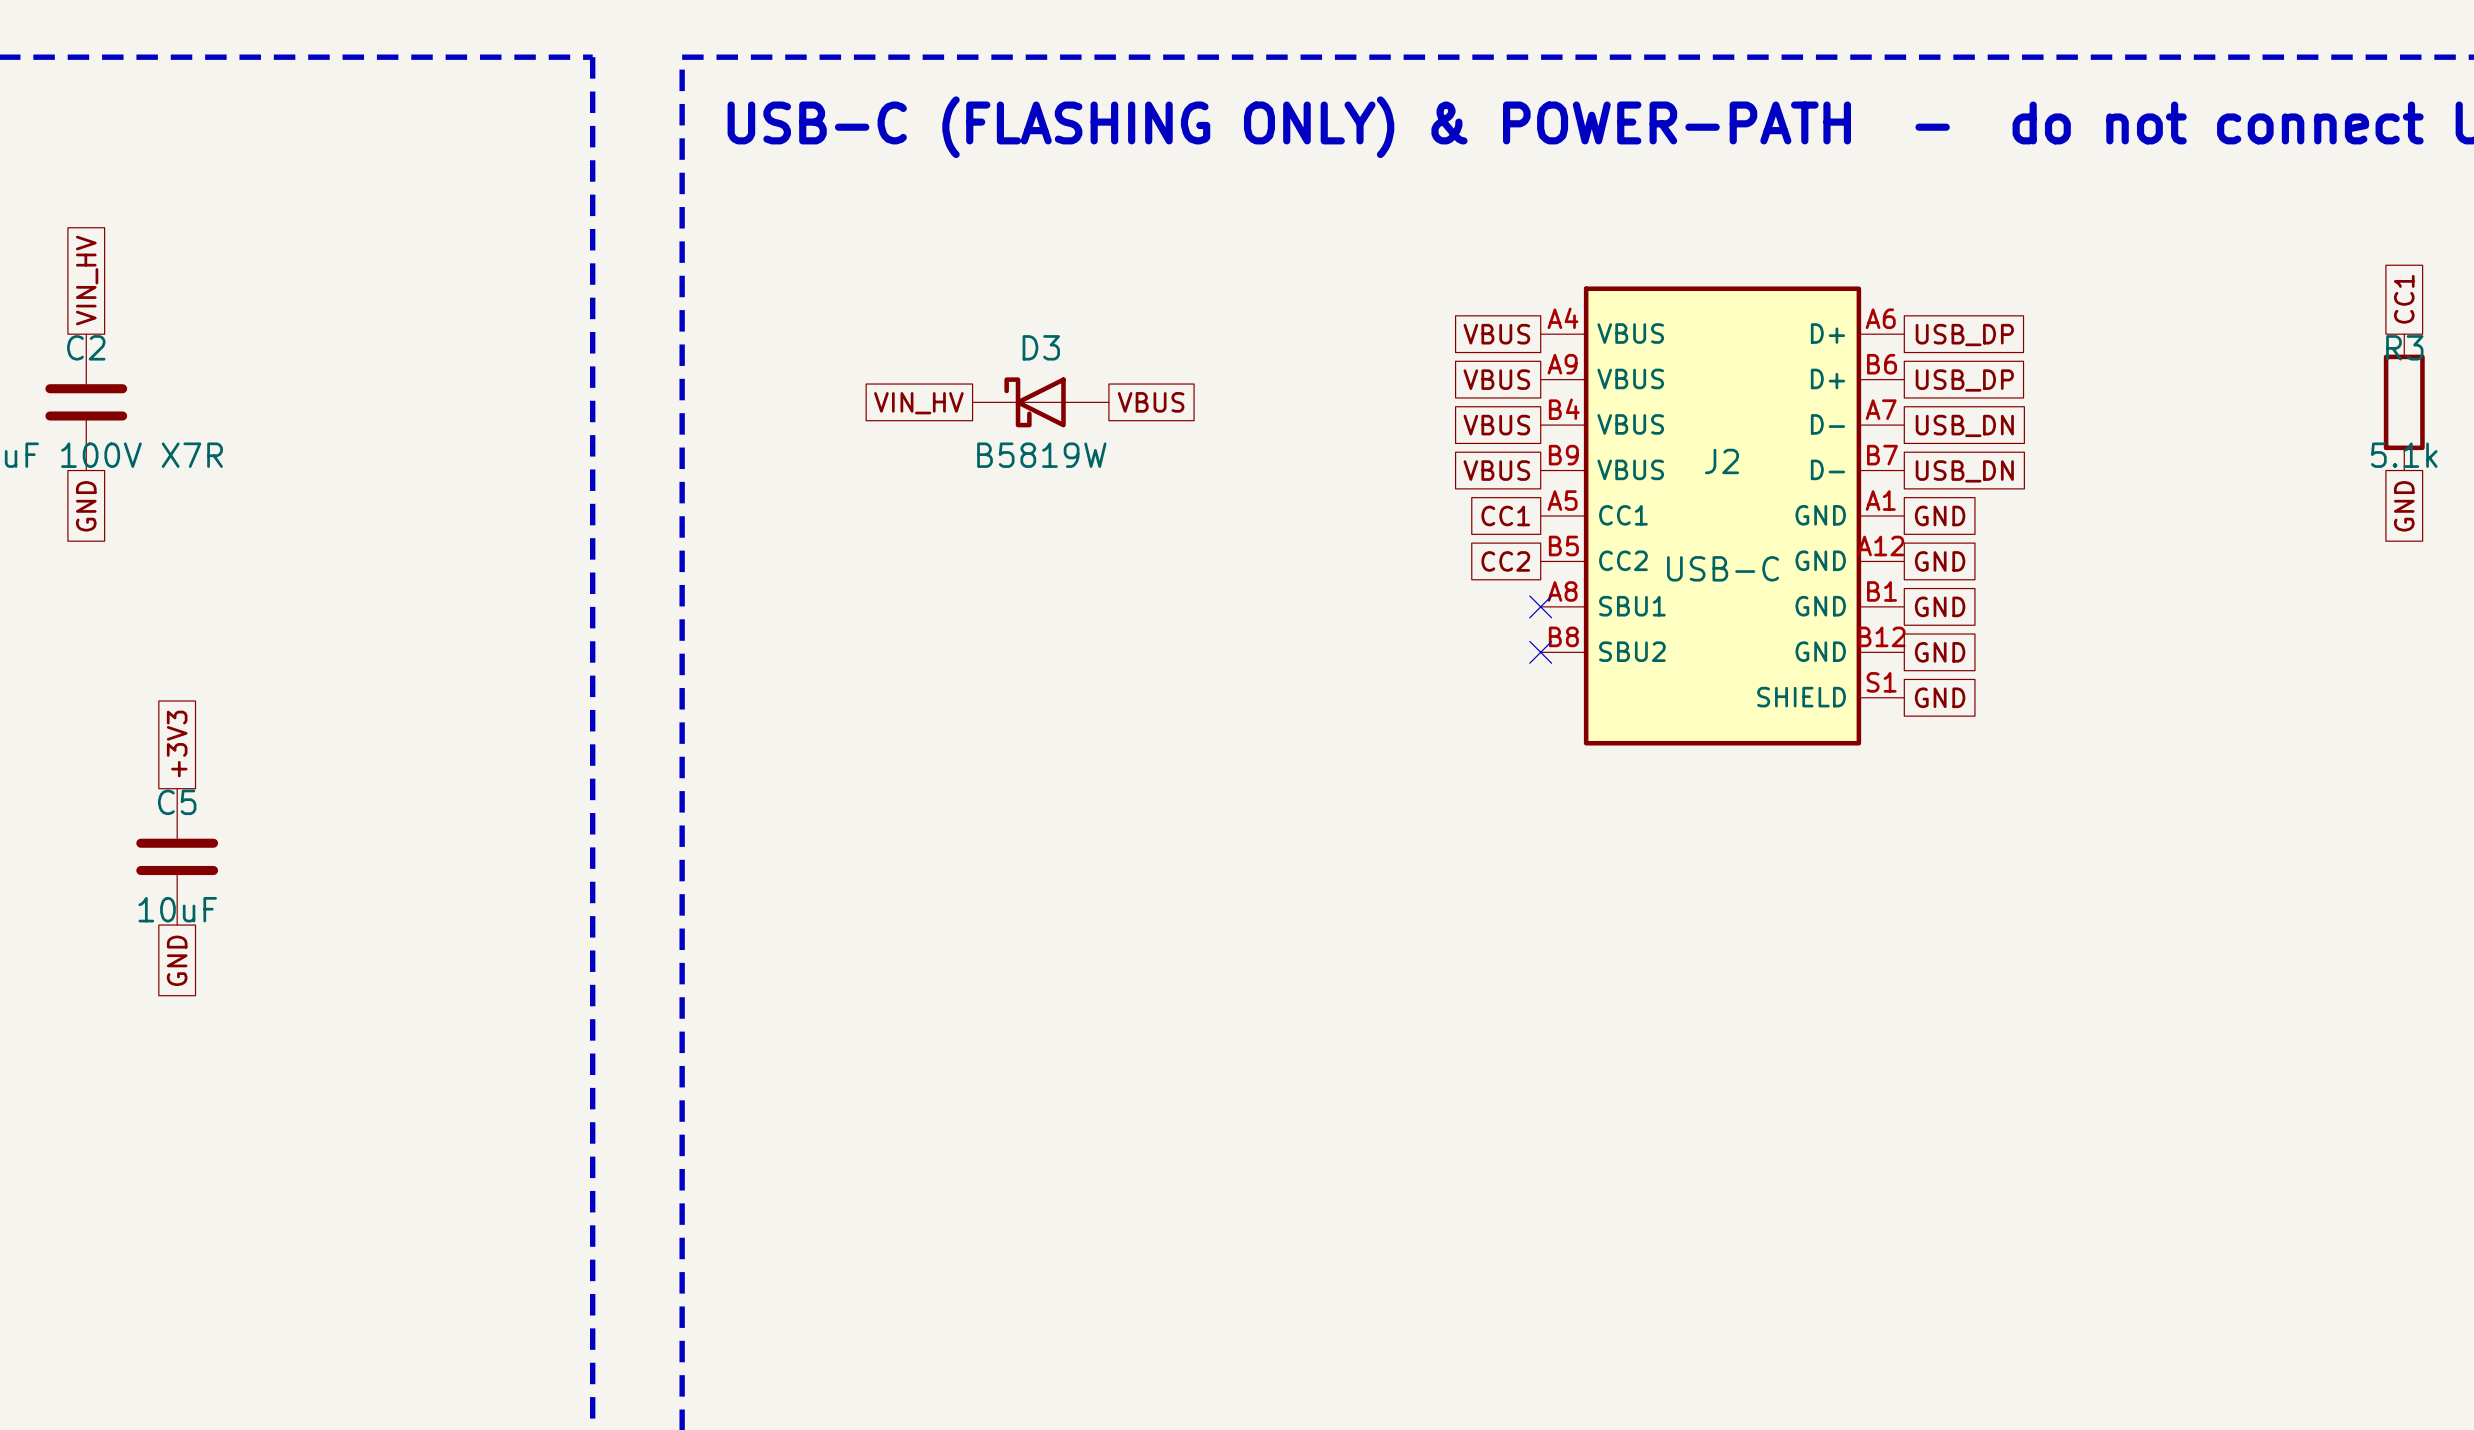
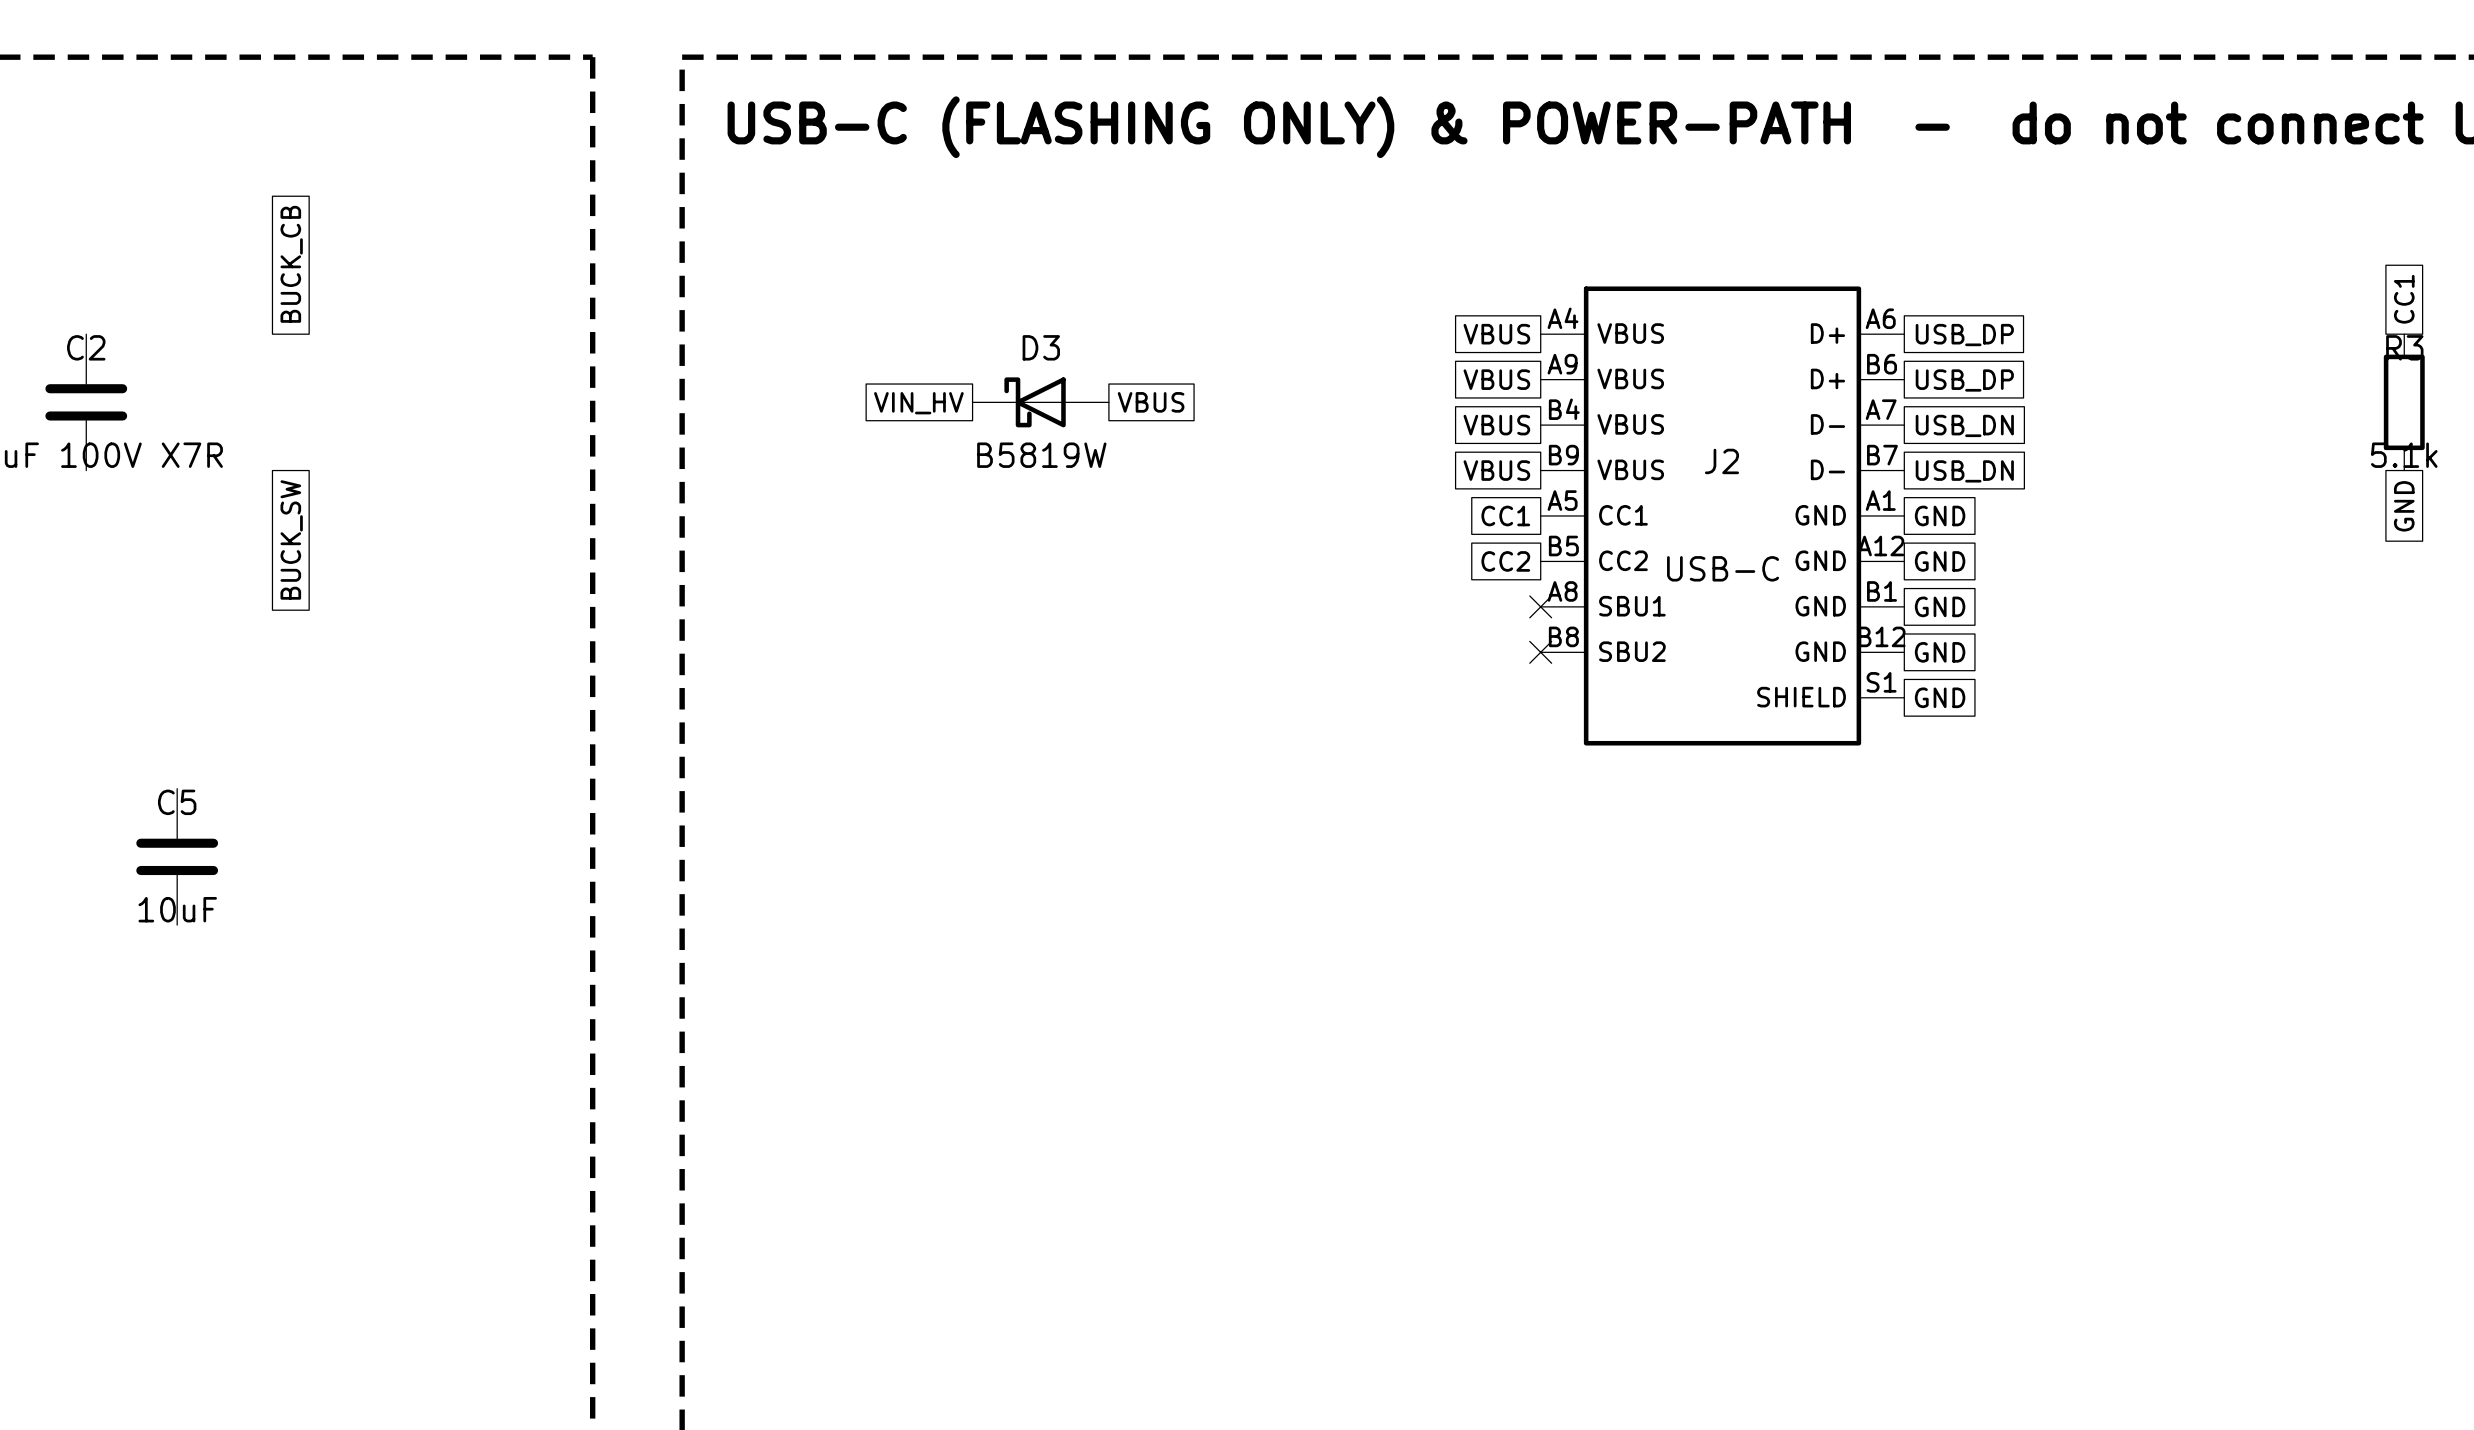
global label: none -> BUCK_CB (291, 264)
global label: VIN_HV (87, 280) -> none
global label: GND (86, 506) -> none
global label: none -> BUCK_SW (291, 539)
global label: +3V3 (177, 743) -> none
global label: GND (177, 960) -> none

